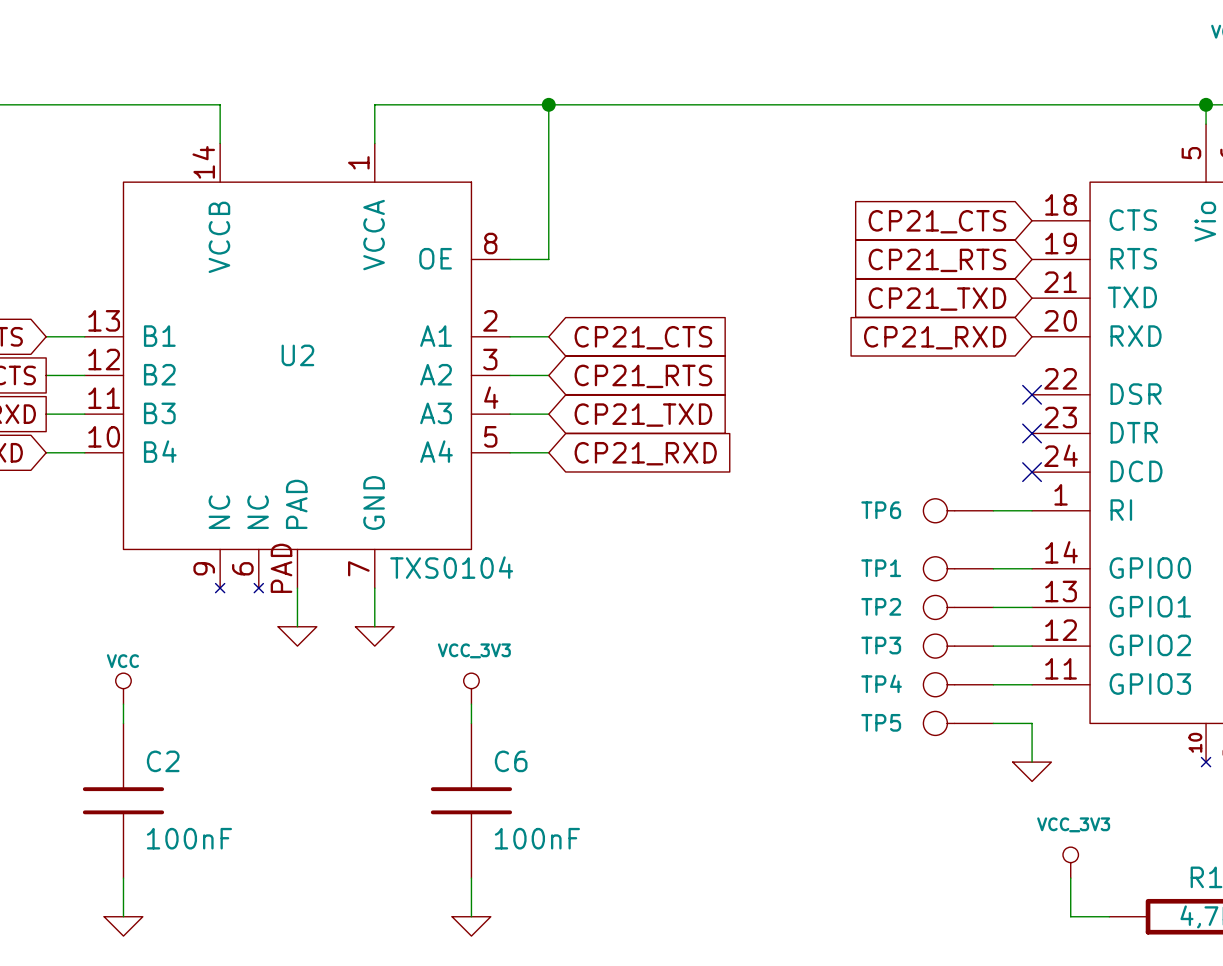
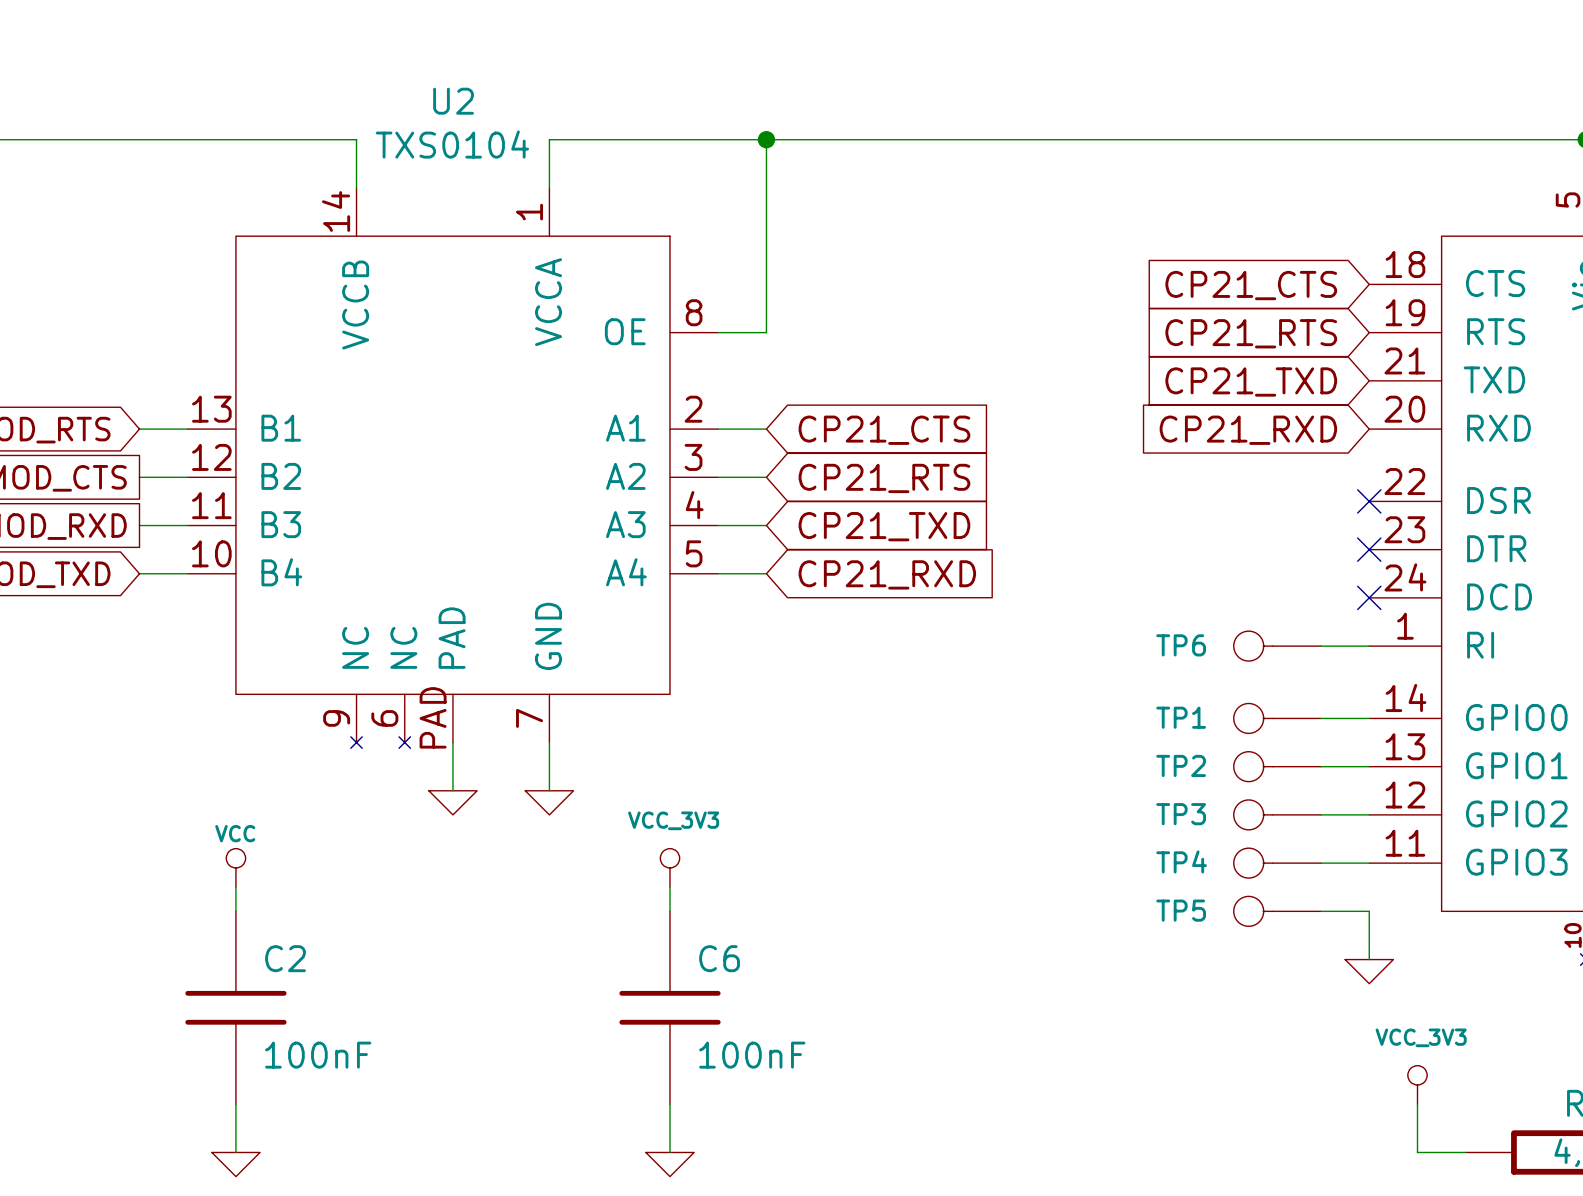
U2 name position: U2 (297, 355) -> U2 (453, 101)
U2 value position: TXS0104 (451, 567) -> TXS0104 (452, 144)

